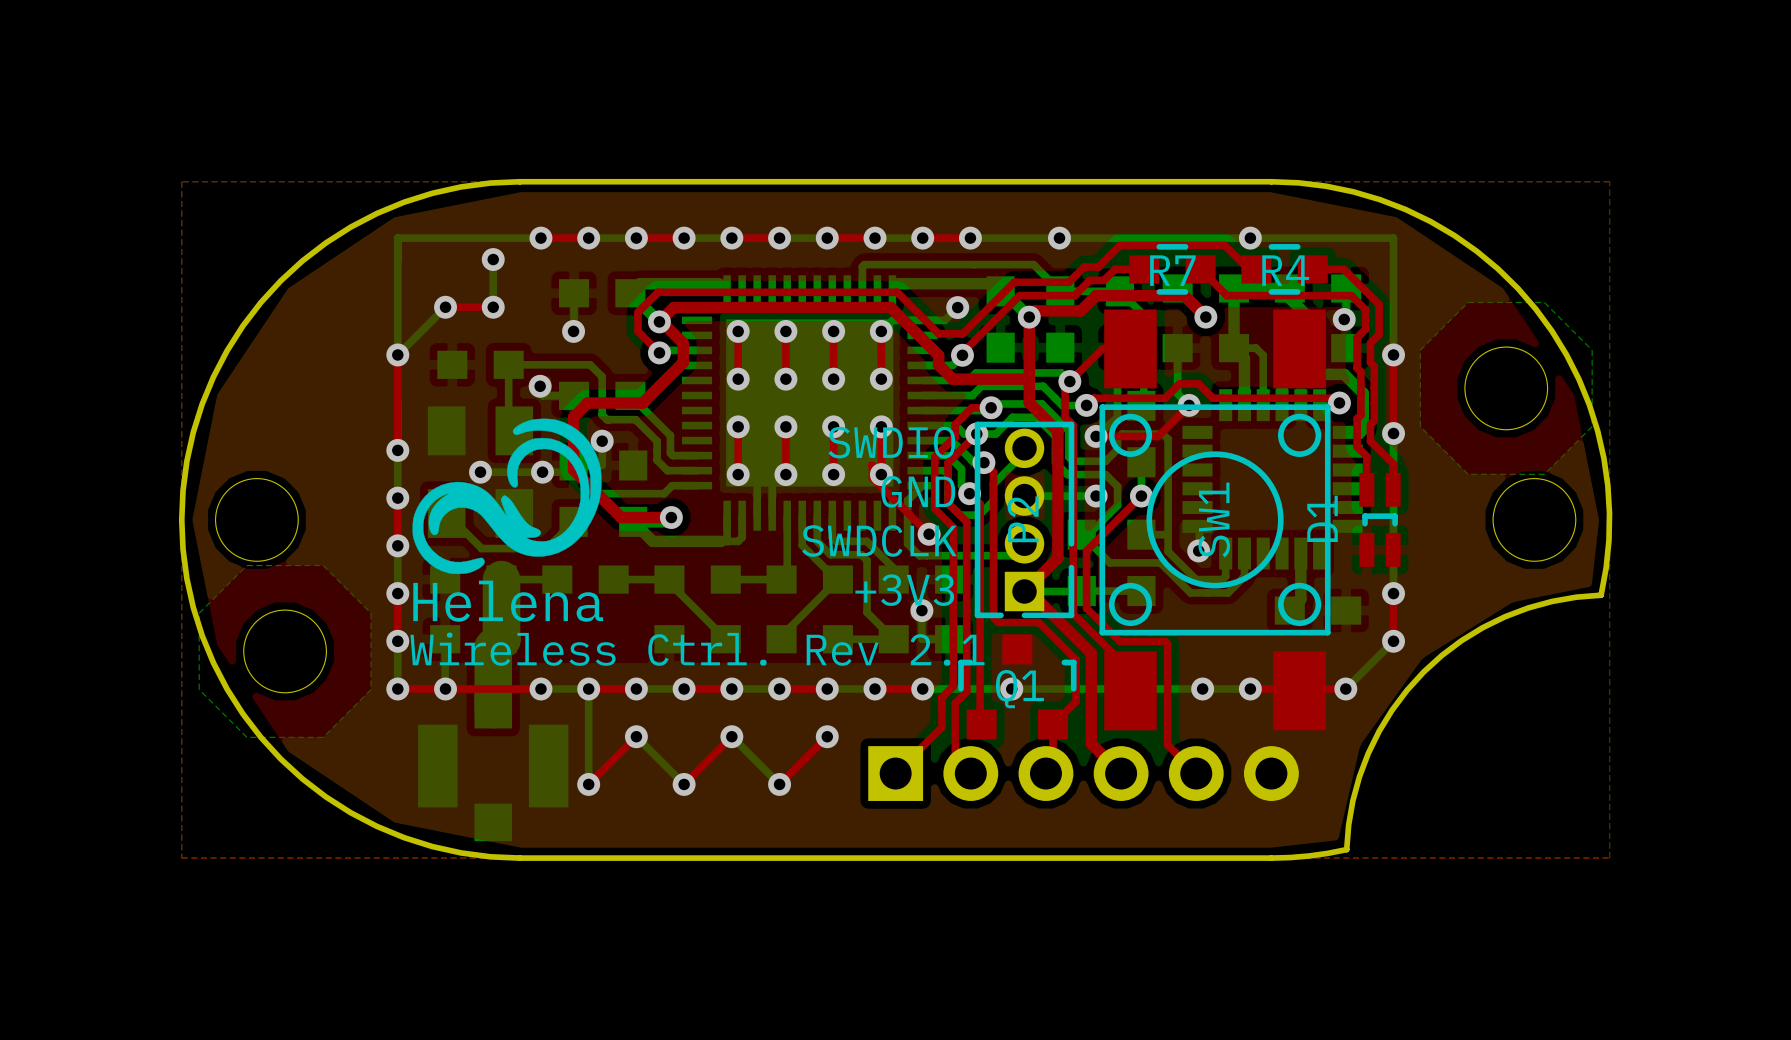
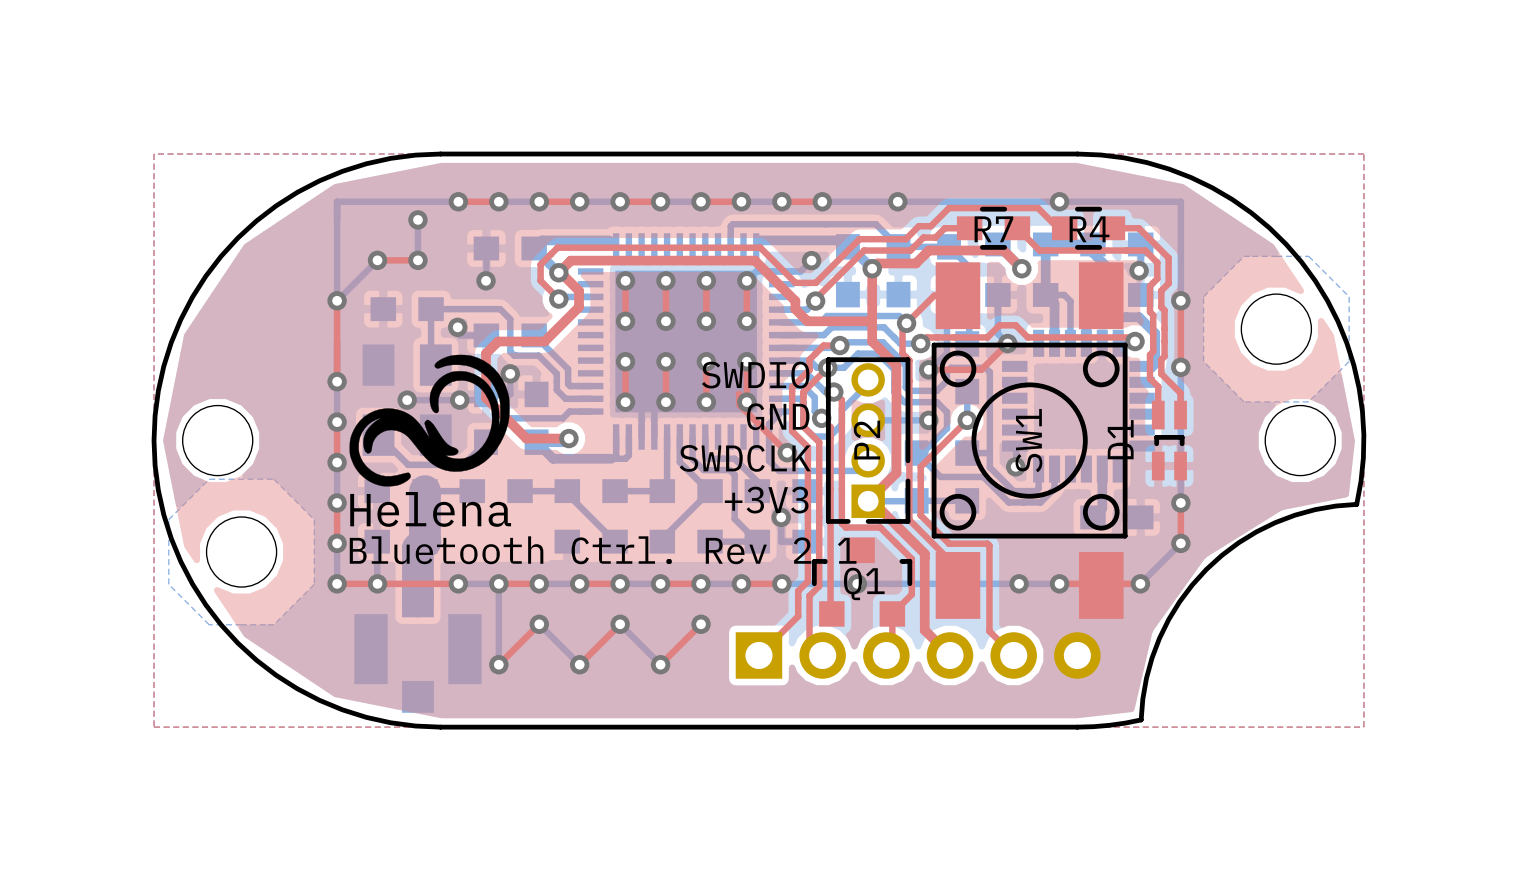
text: Wireless Ctrl. Rev 2.1 (697, 649) -> Bluetooth Ctrl. Rev 2.1 (603, 550)

